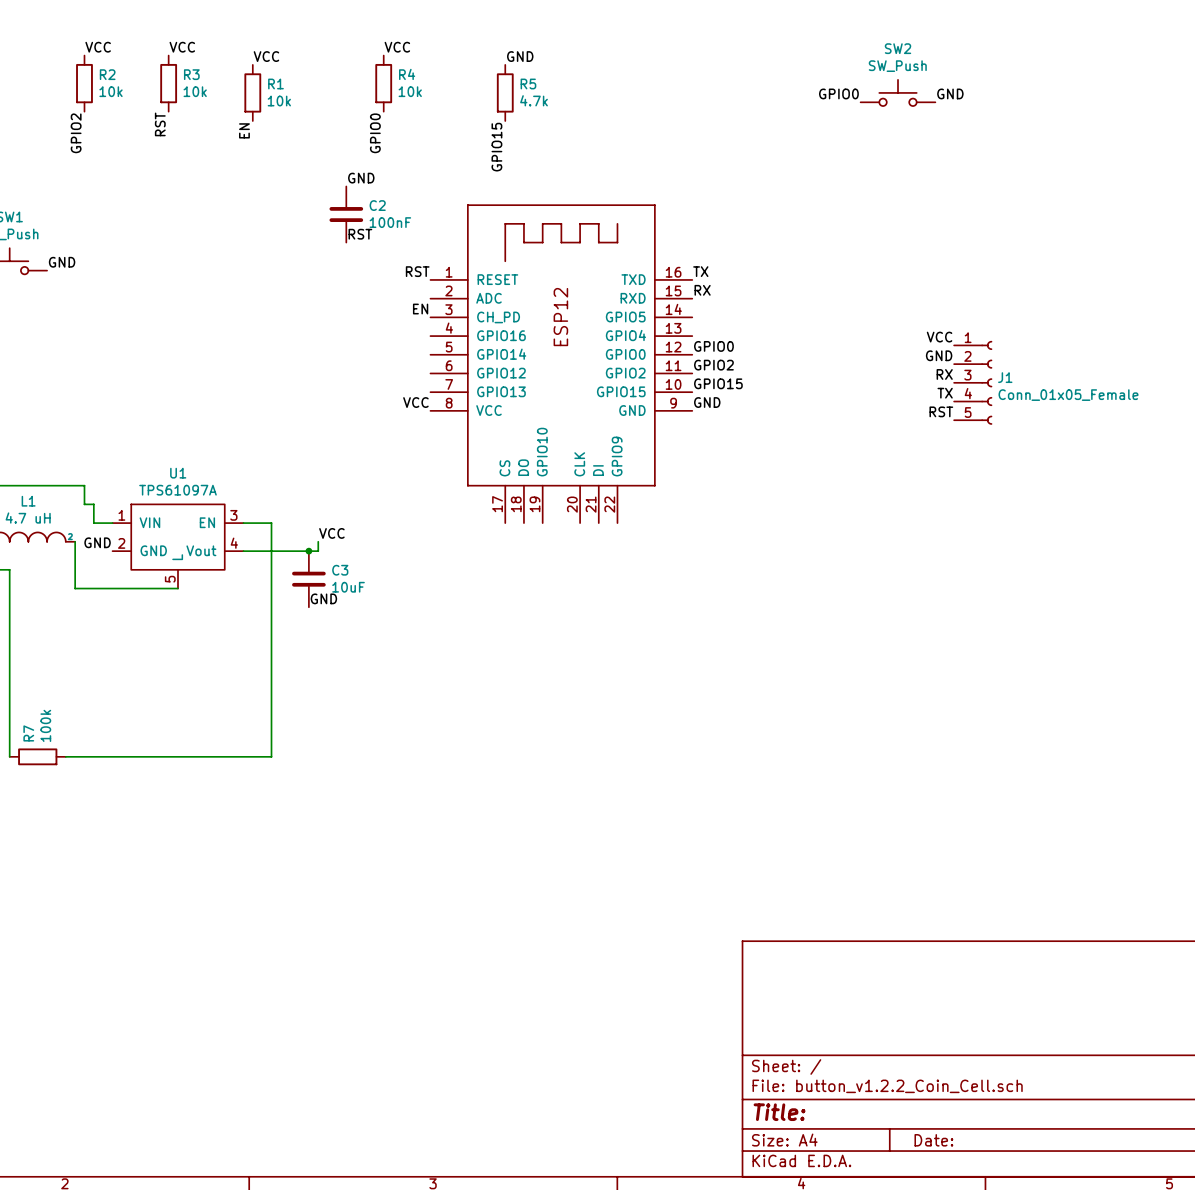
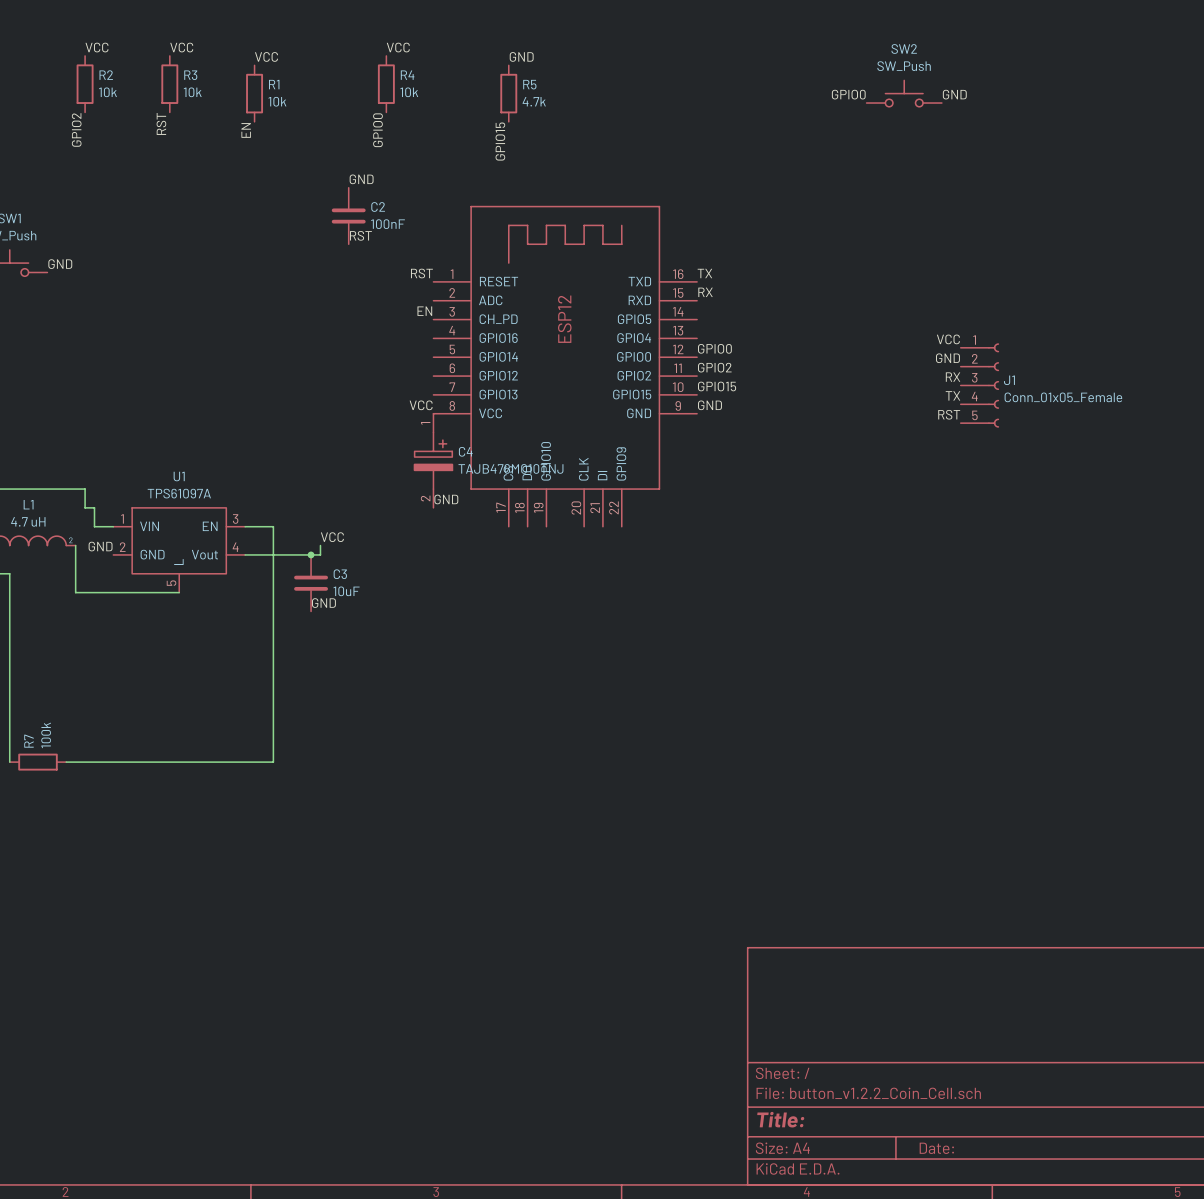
C4: none -> TAJB476M010TNJ (433, 460)
label: none -> GND (446, 499)

